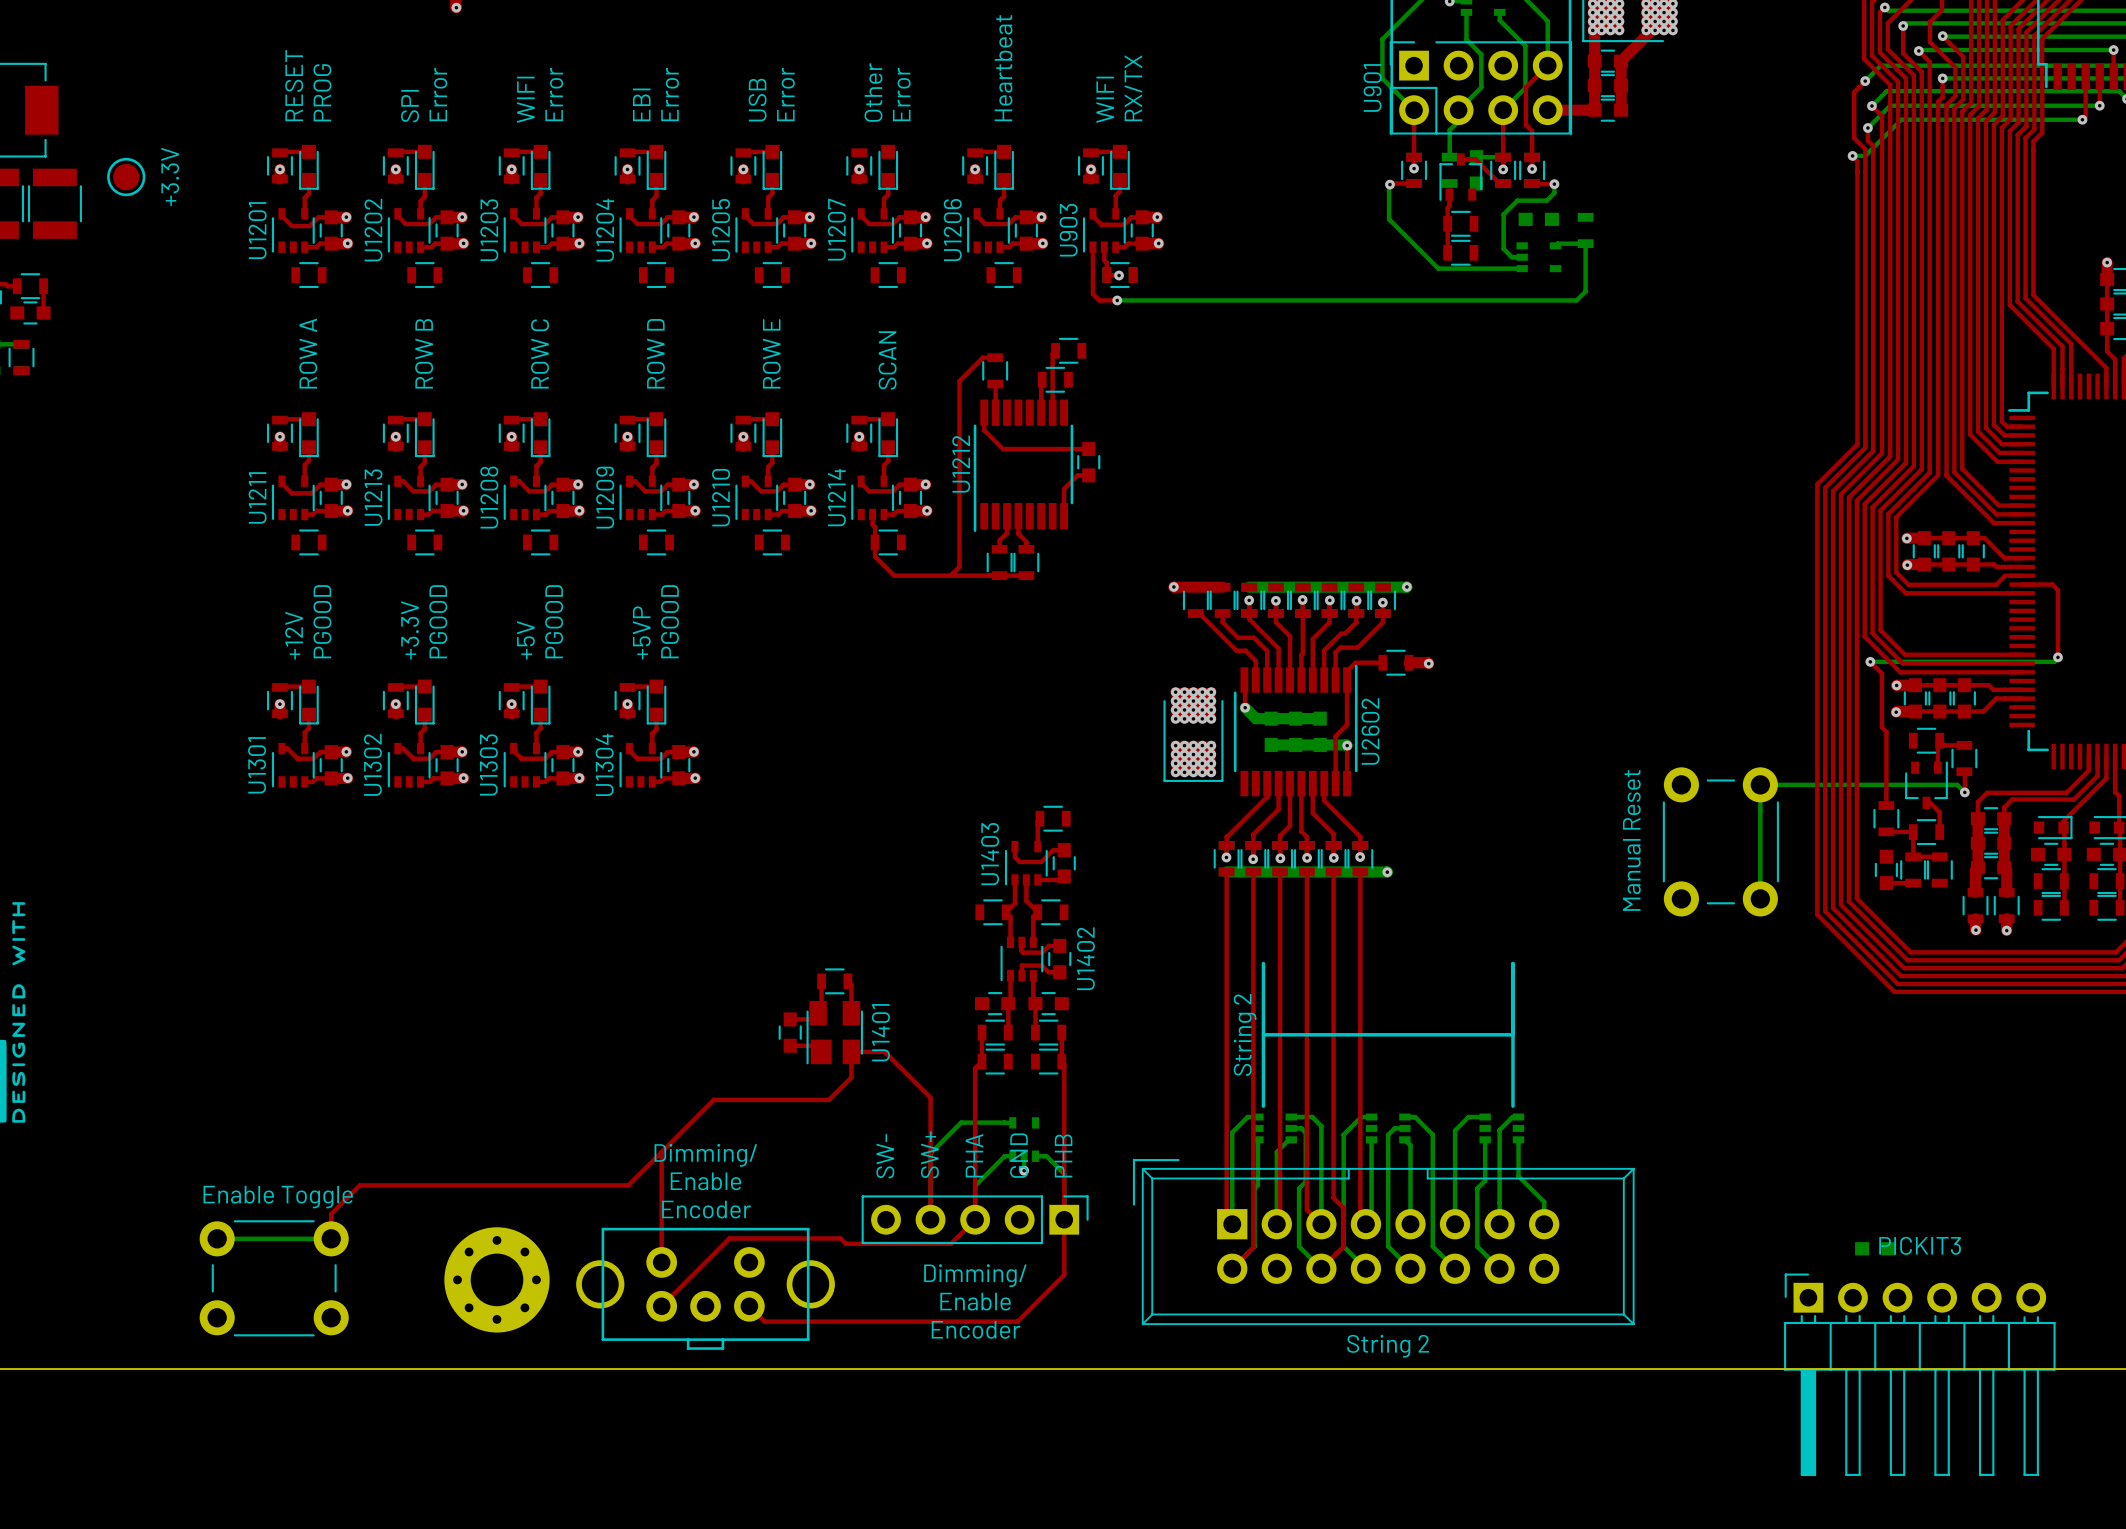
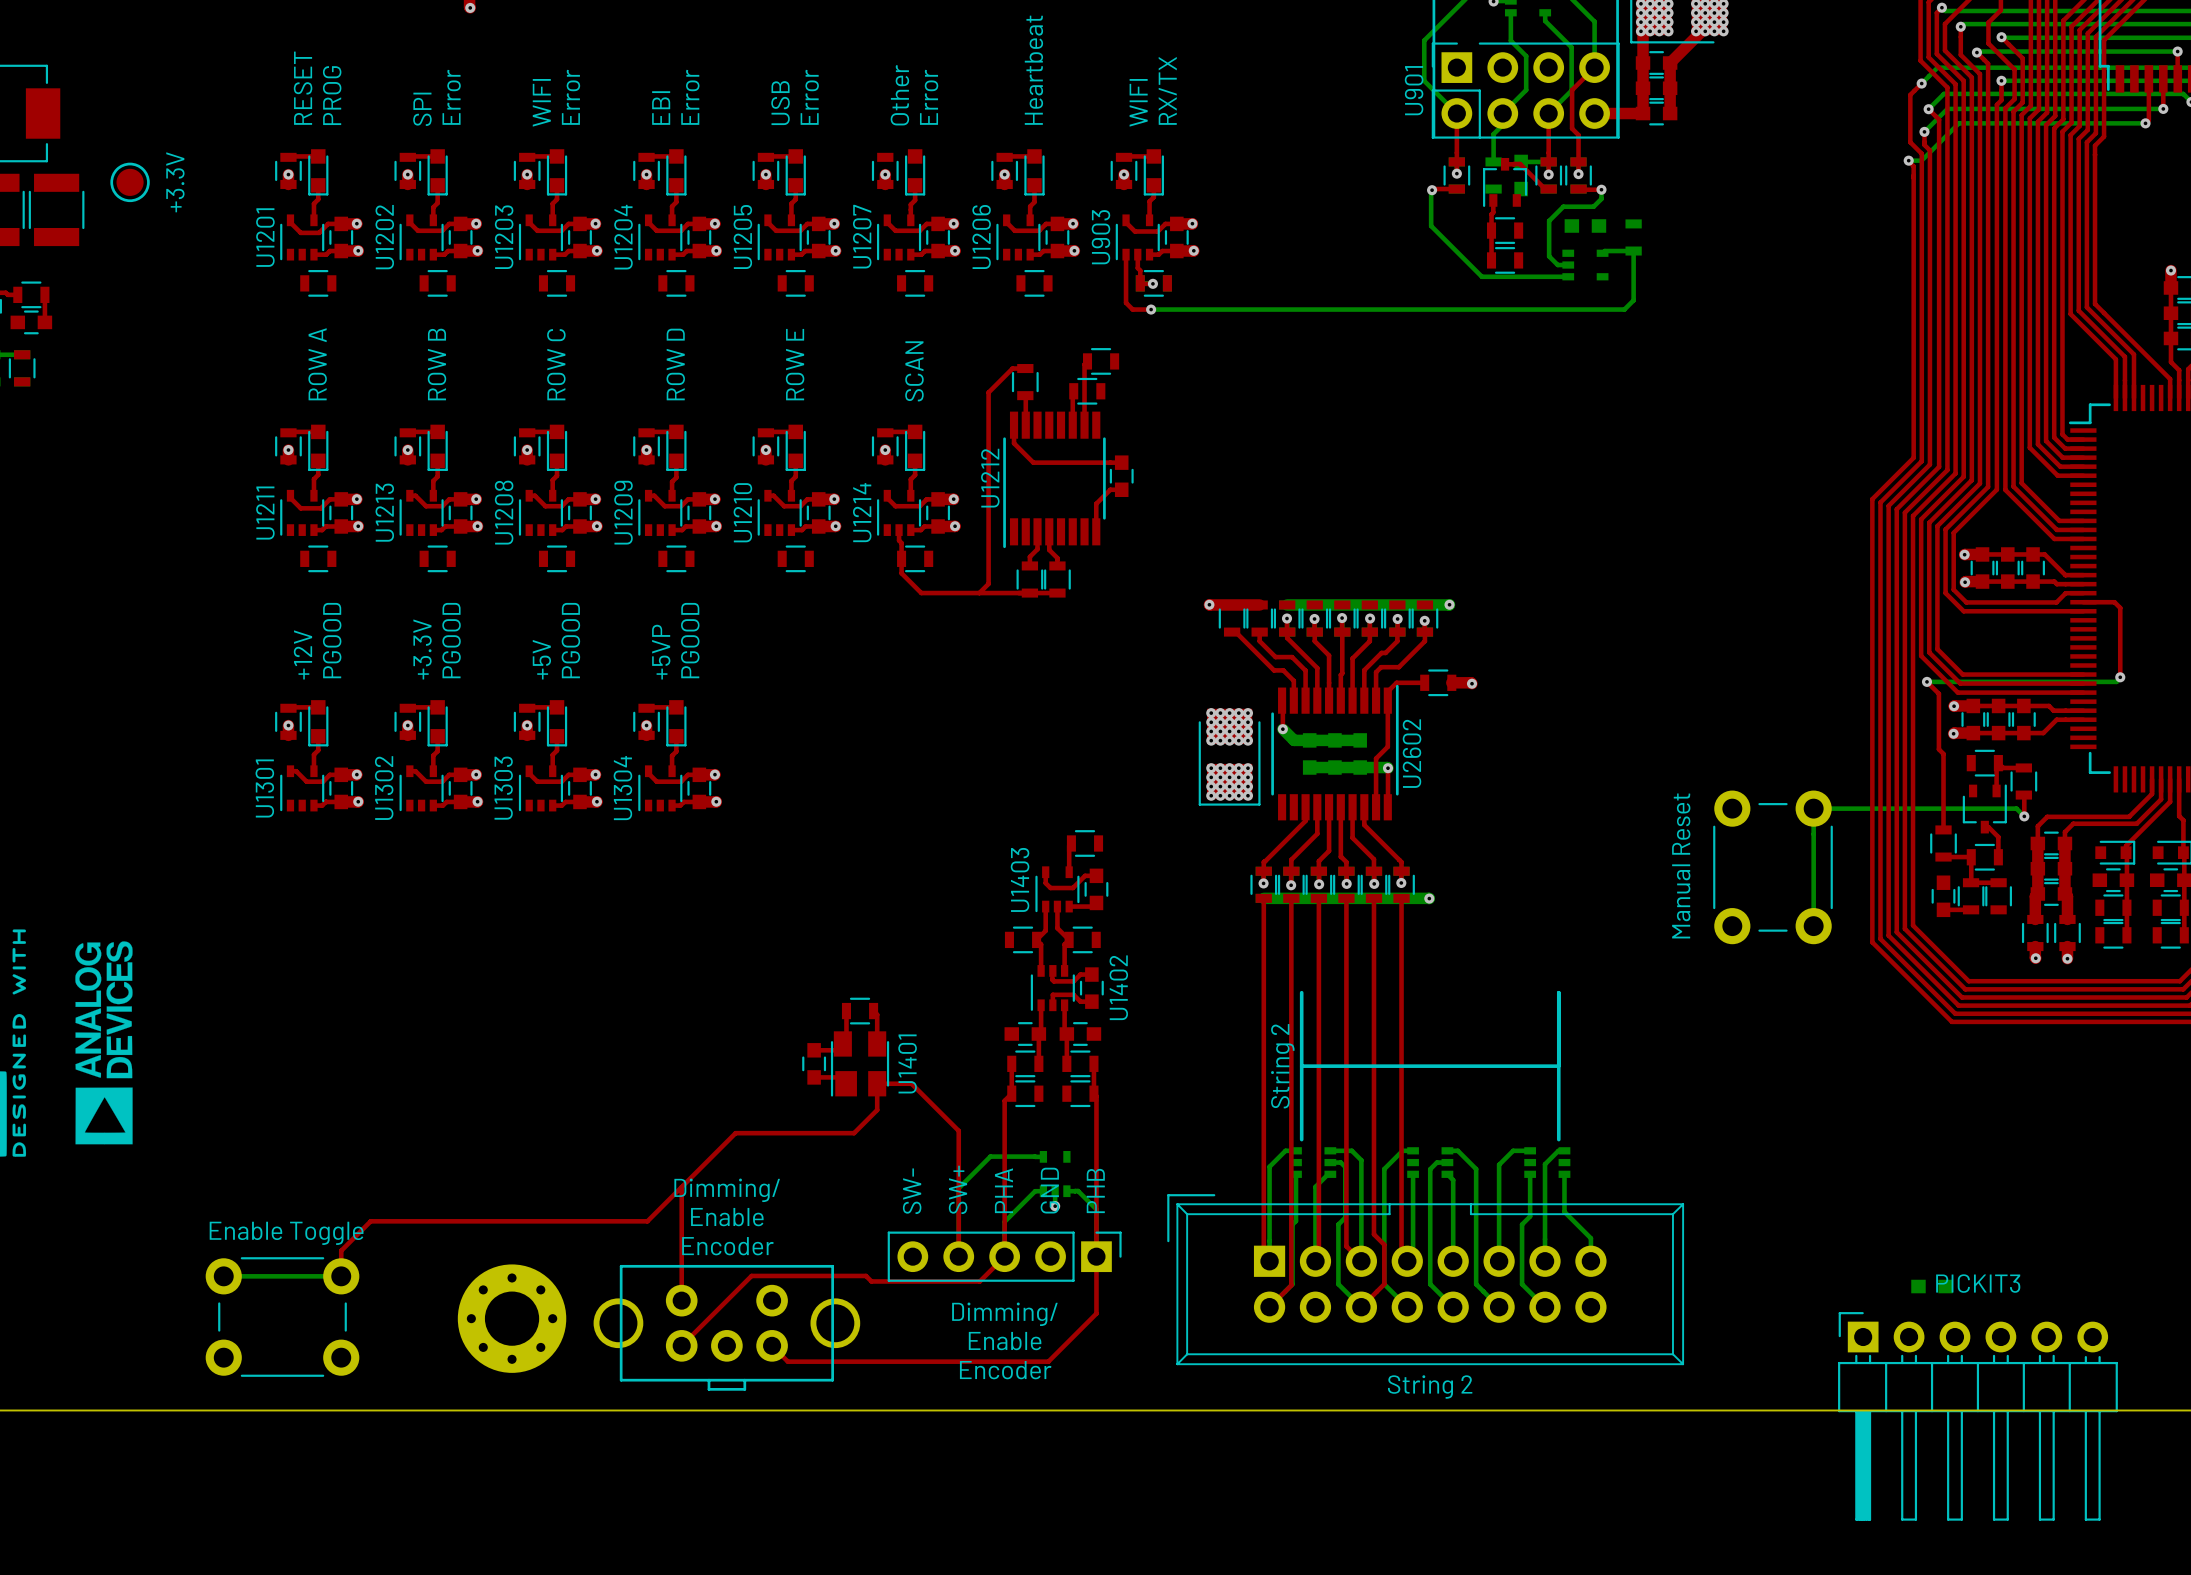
drawing: none -> [75, 941, 133, 1145]

